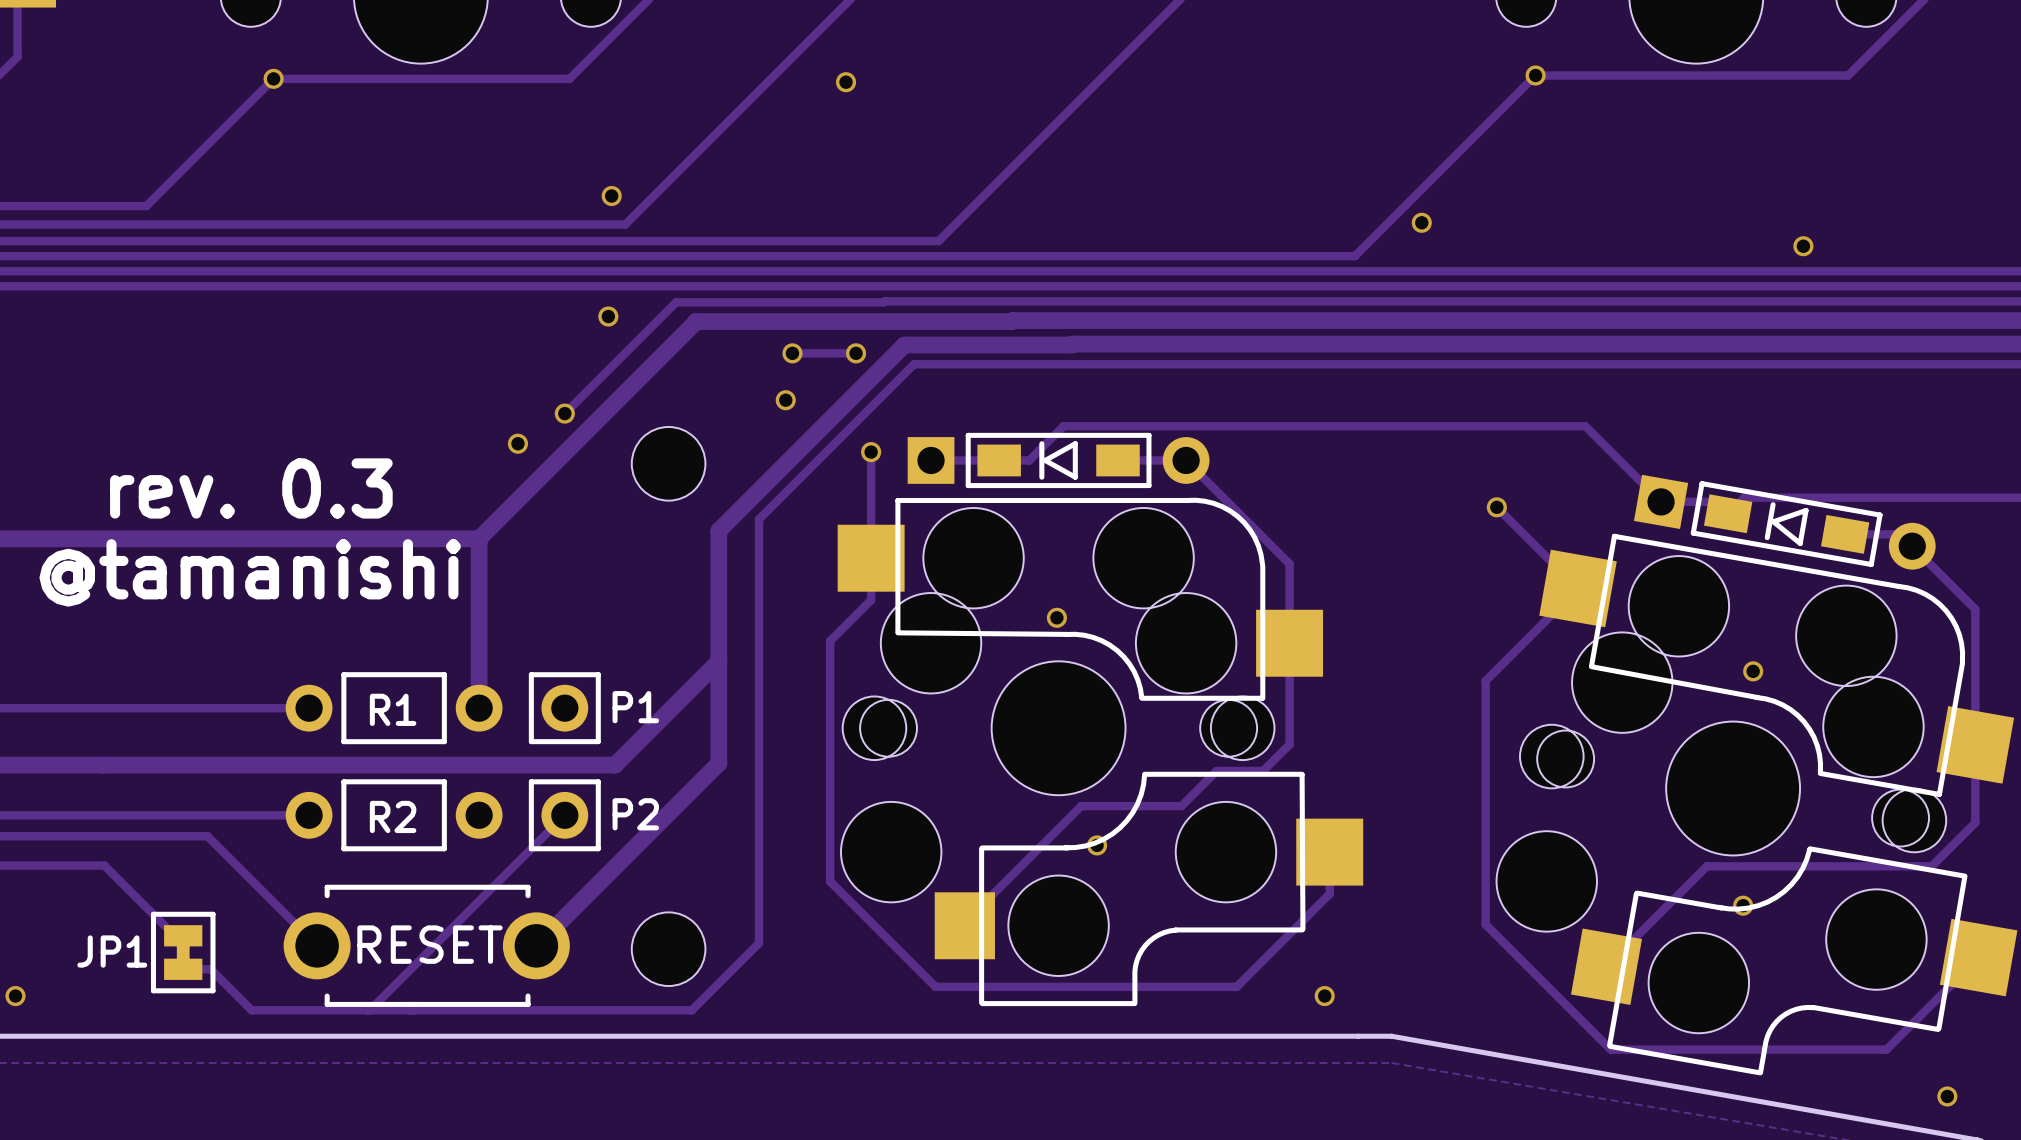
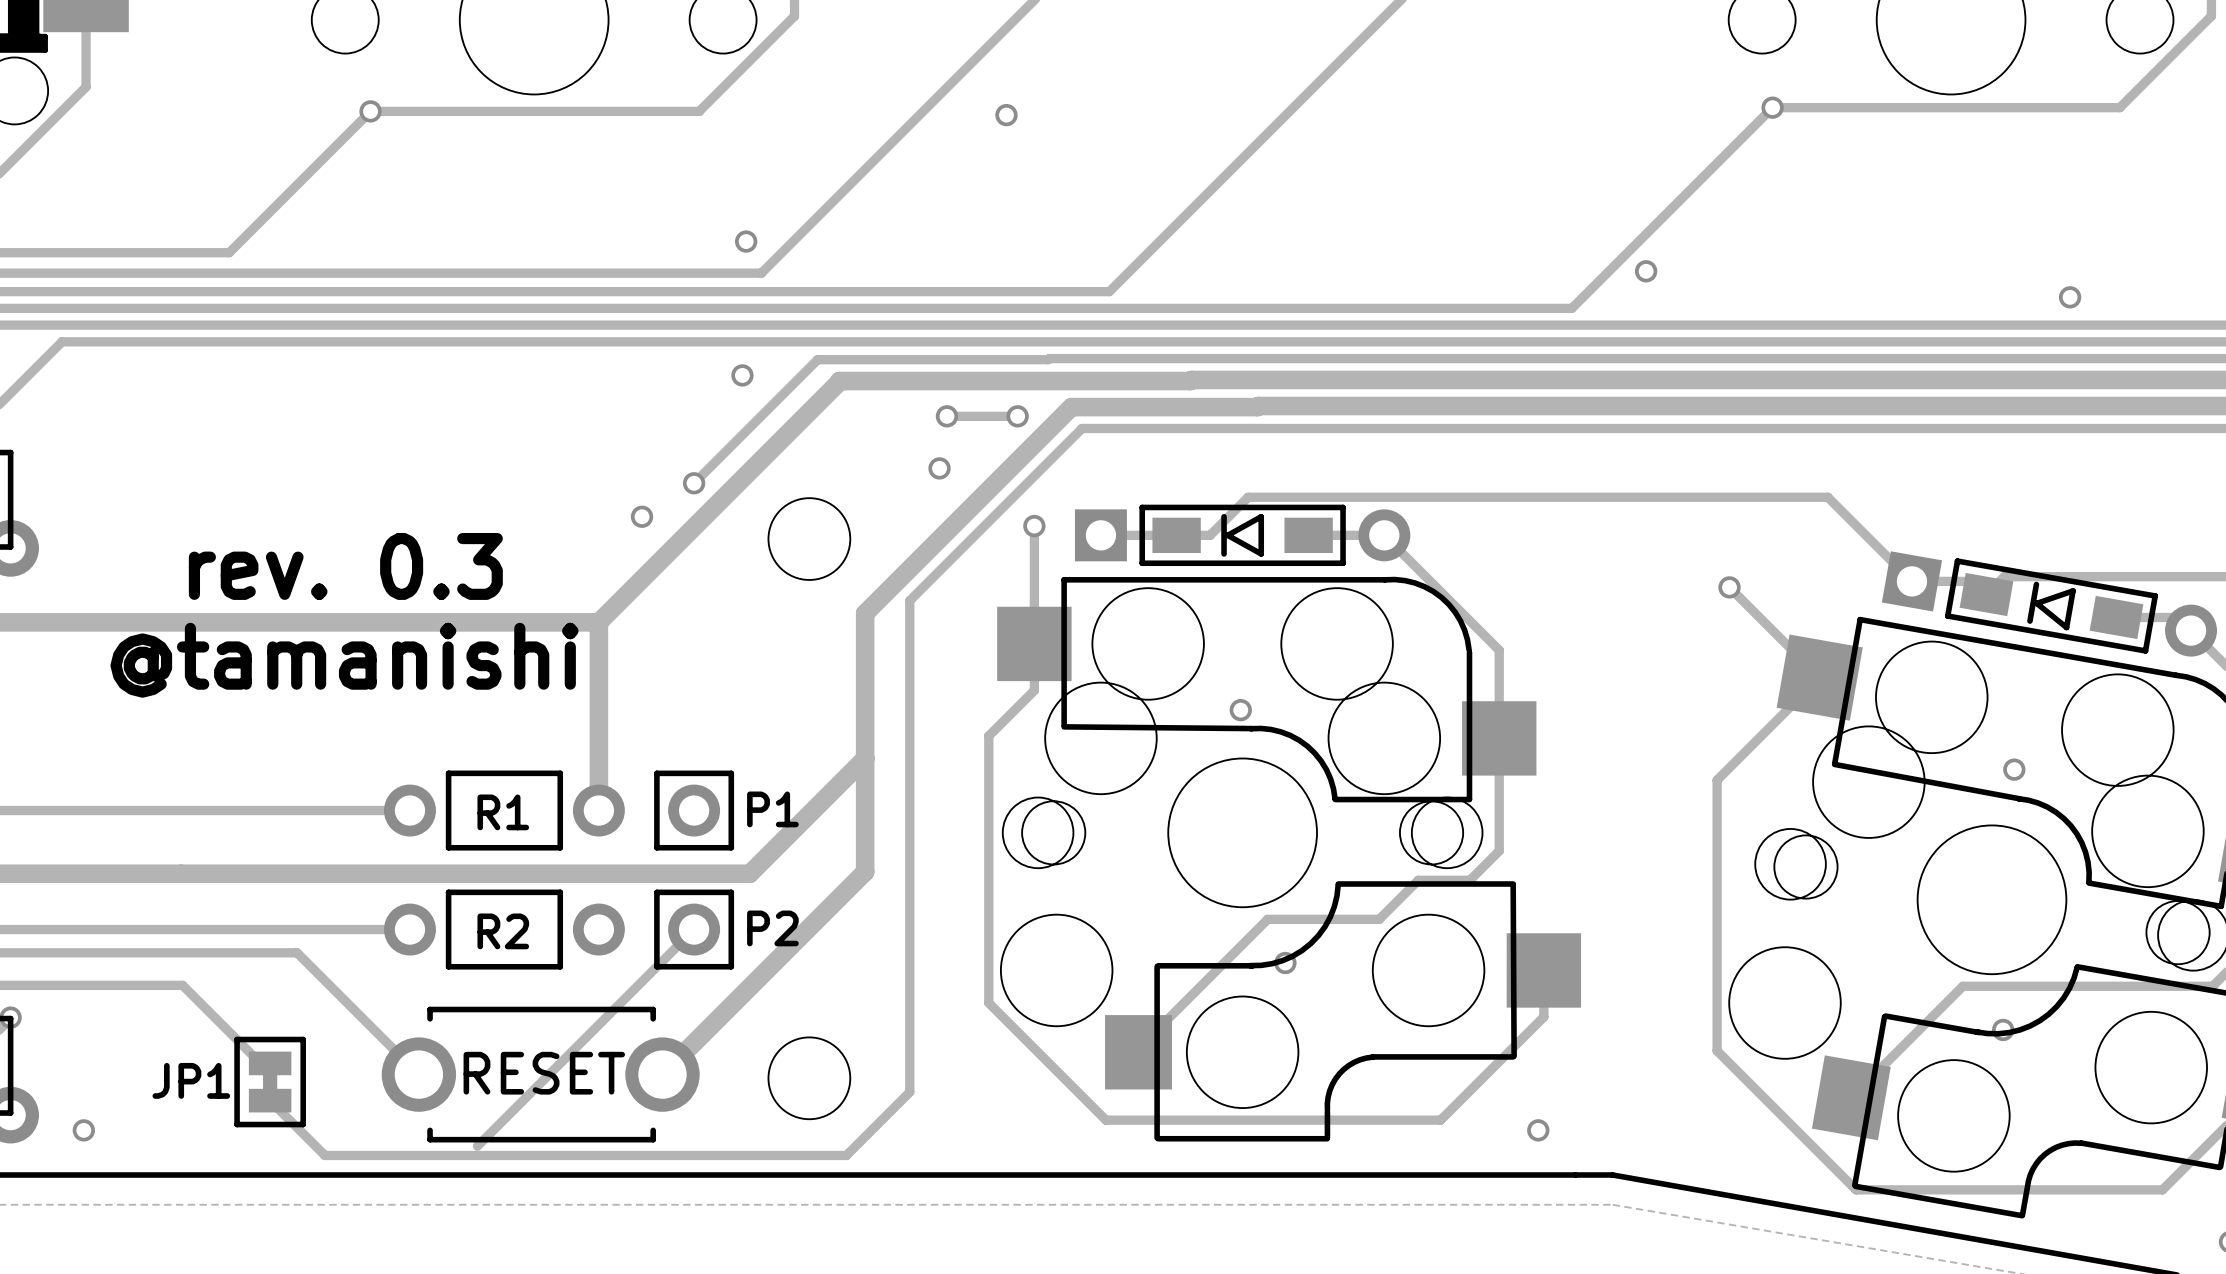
track: (758, 943) (691, 1010) (251, 1010) (210, 969) (183, 969) -> (909, 1071) (909, 1092) (846, 1155) (324, 1155) (270, 1101)

